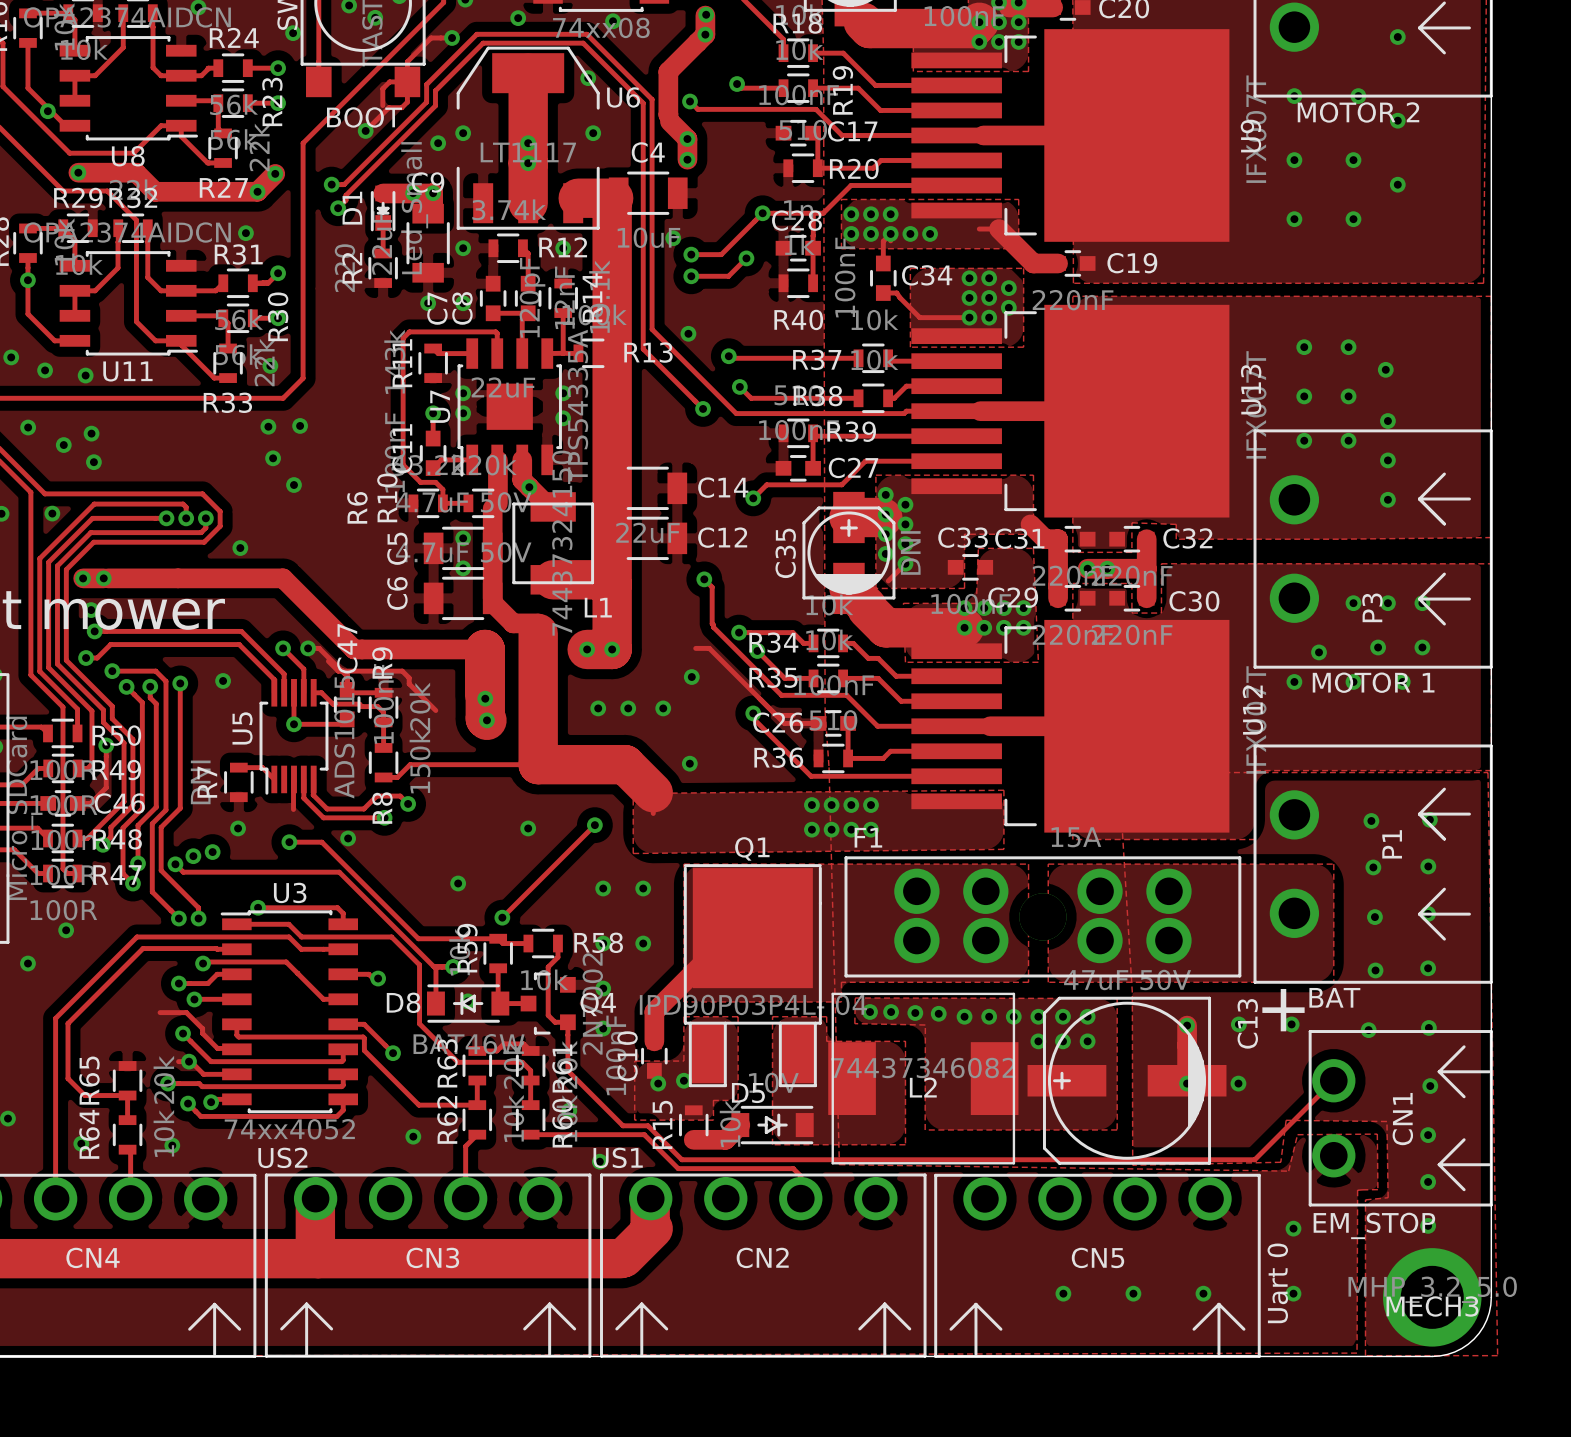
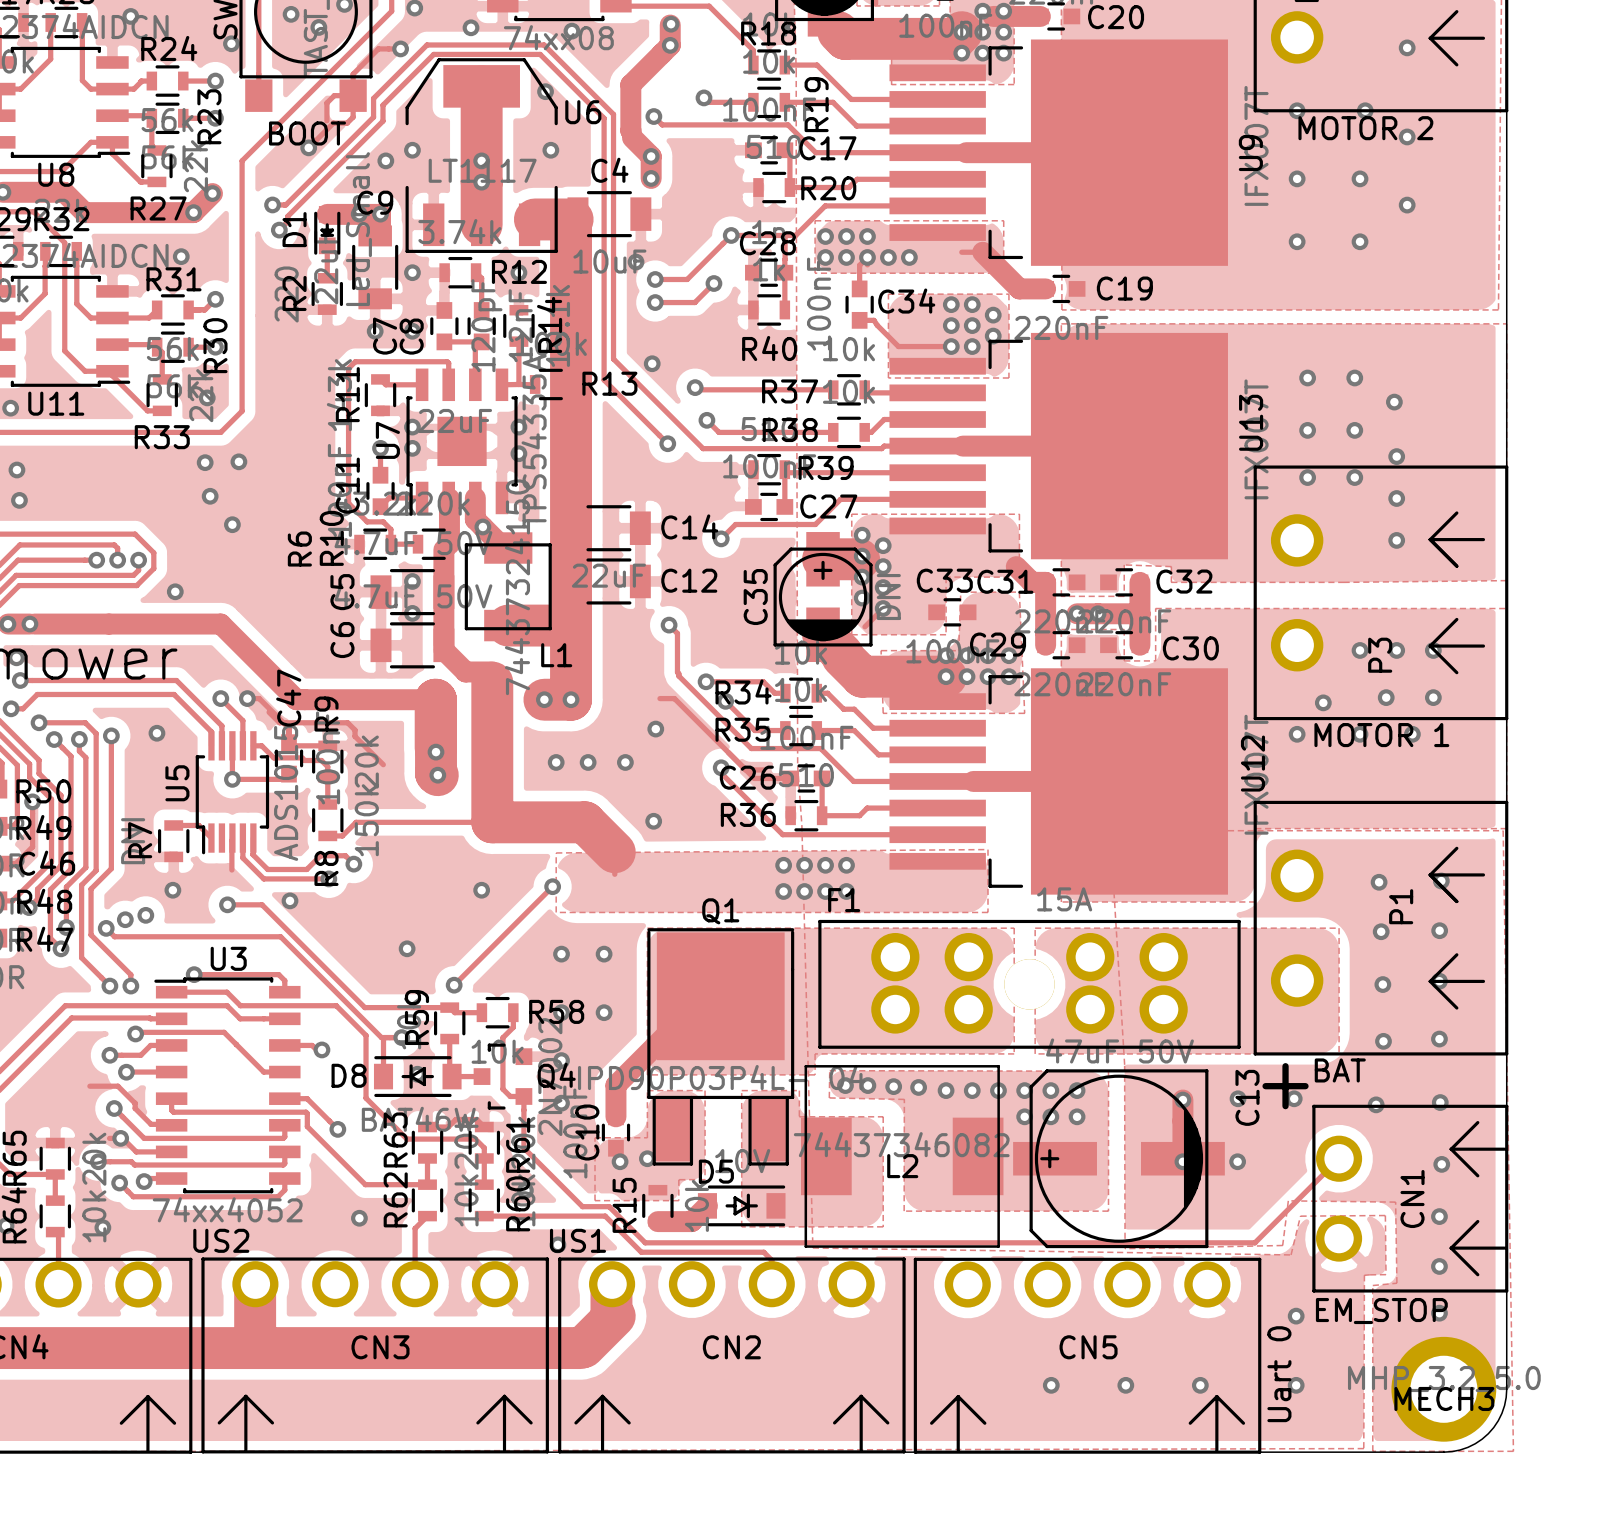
zone outline: (1003, 790) (633, 793) (633, 853) (1003, 849) -> (987, 849) (556, 852) (556, 912) (987, 912)

